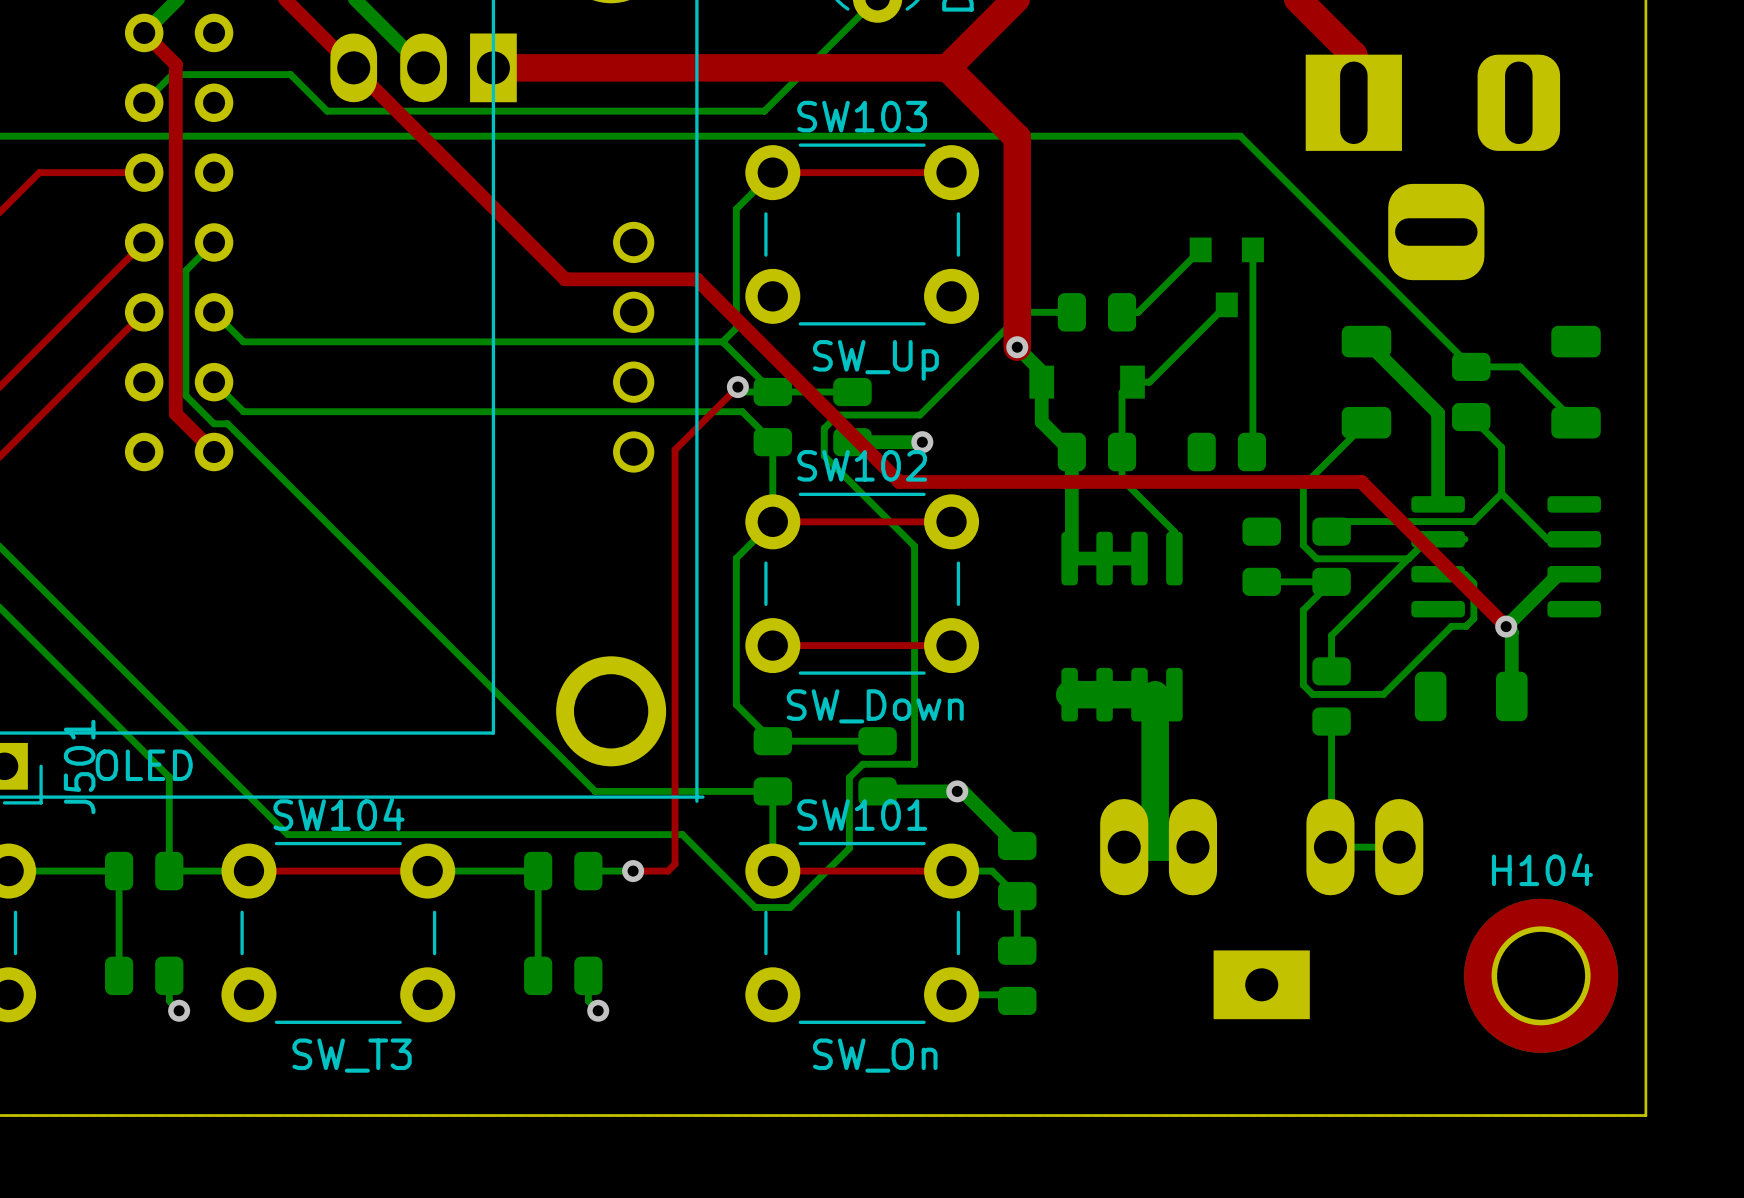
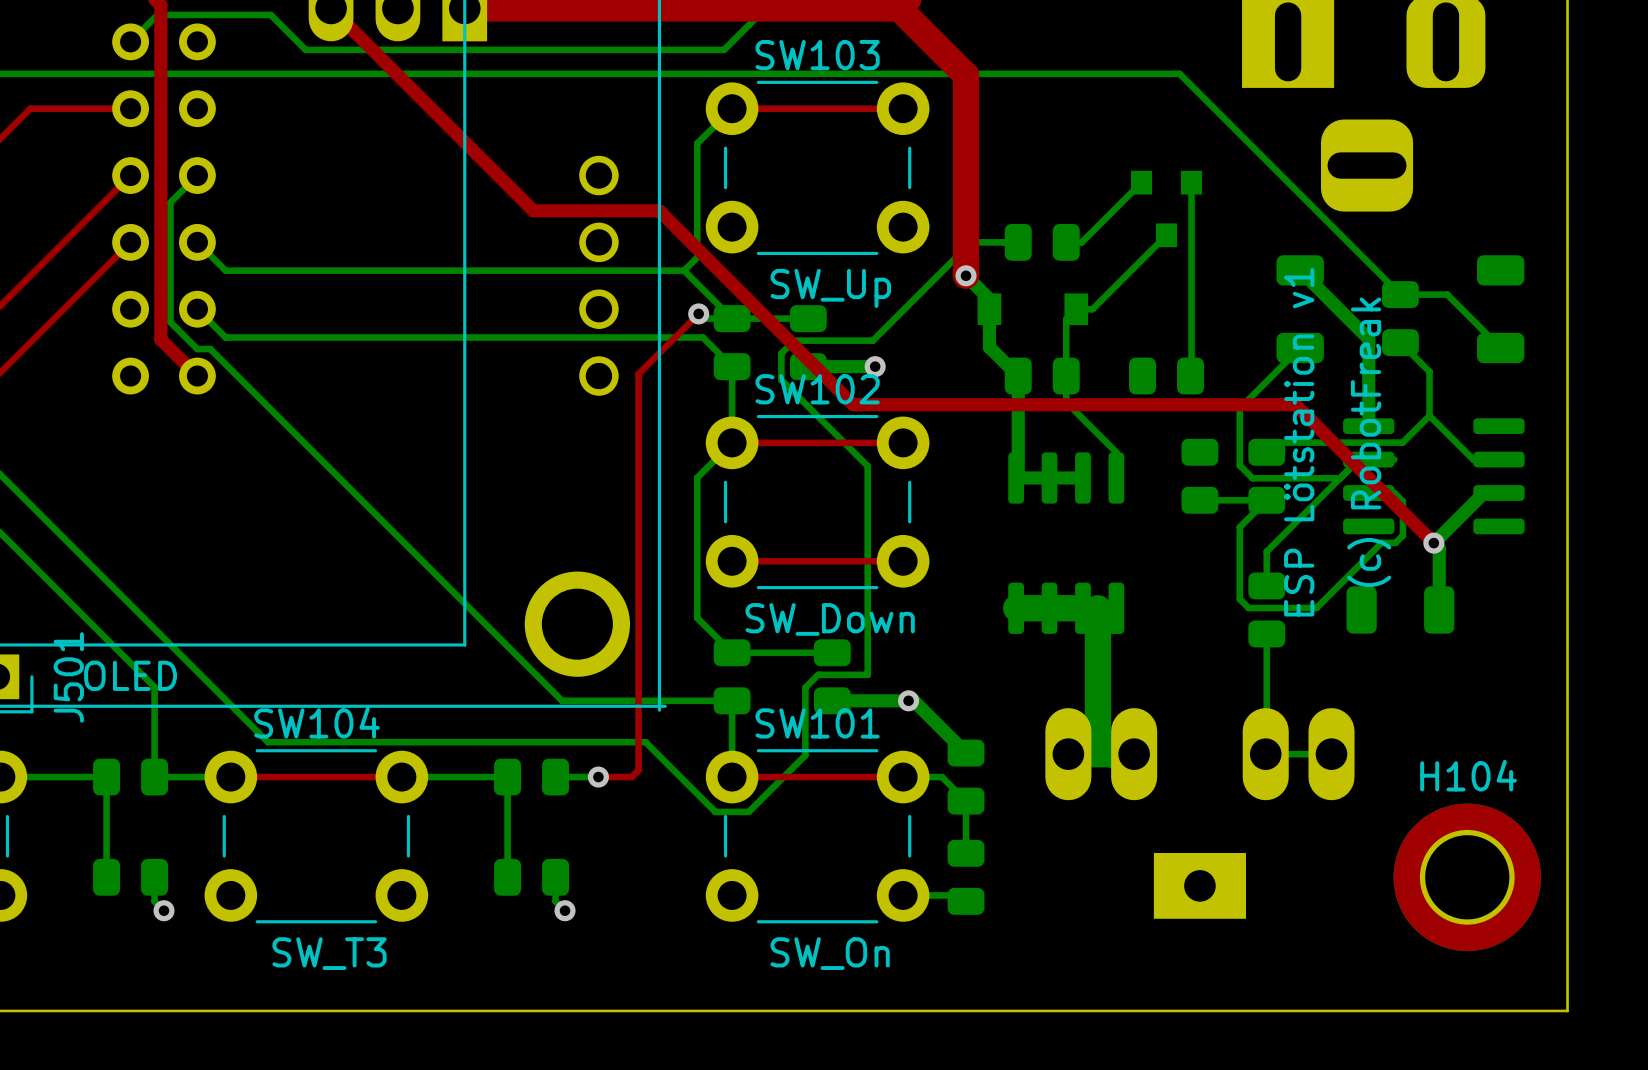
text: none -> ESP Lötstation v1 (1299, 442)
text: none -> (c) RobotFreak (1369, 442)

